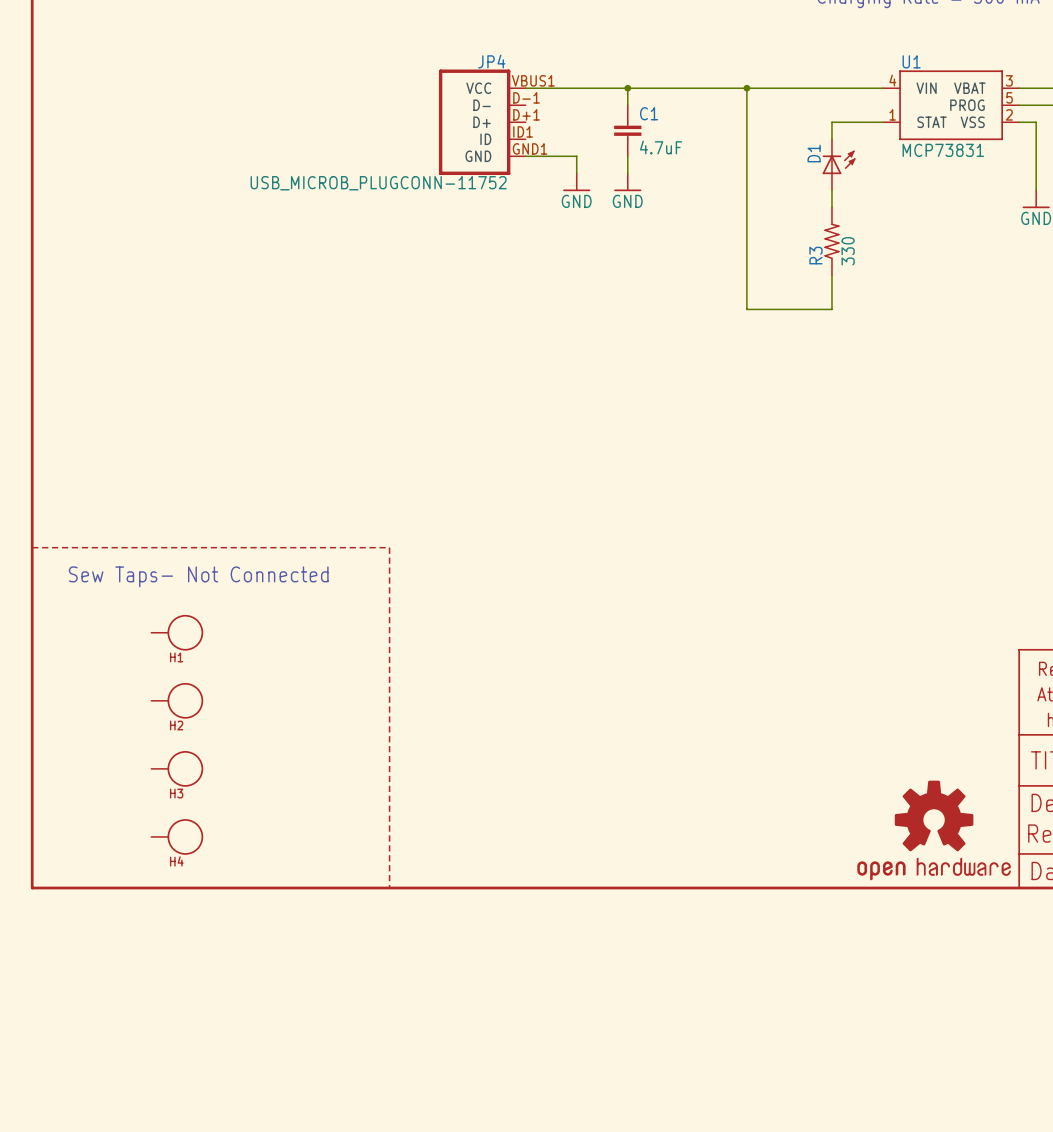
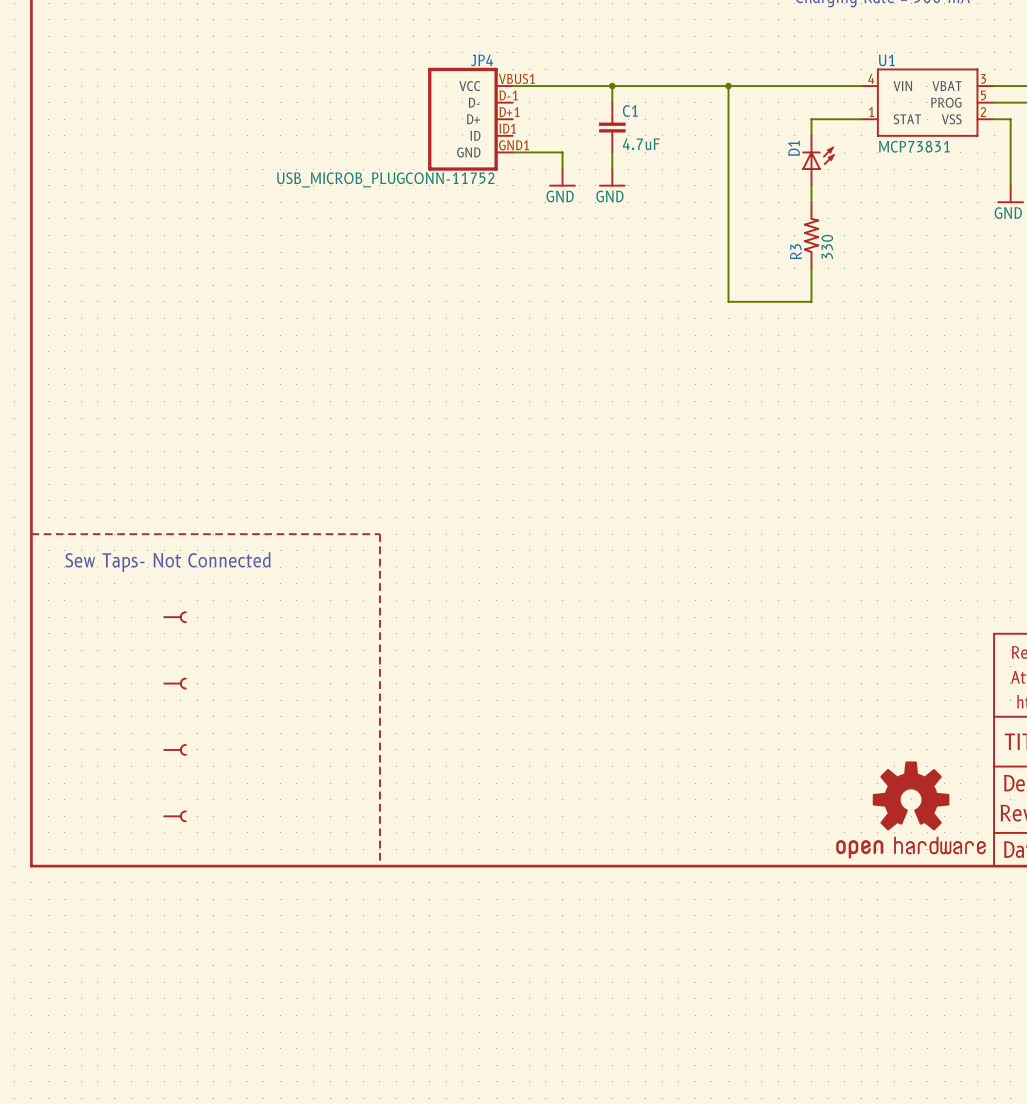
H1: (177, 632) -> none
part: none -> (174, 617)
H2: (177, 700) -> none
part: none -> (174, 683)
H3: (177, 768) -> none
part: none -> (174, 749)
H4: (177, 836) -> none
part: none -> (174, 816)

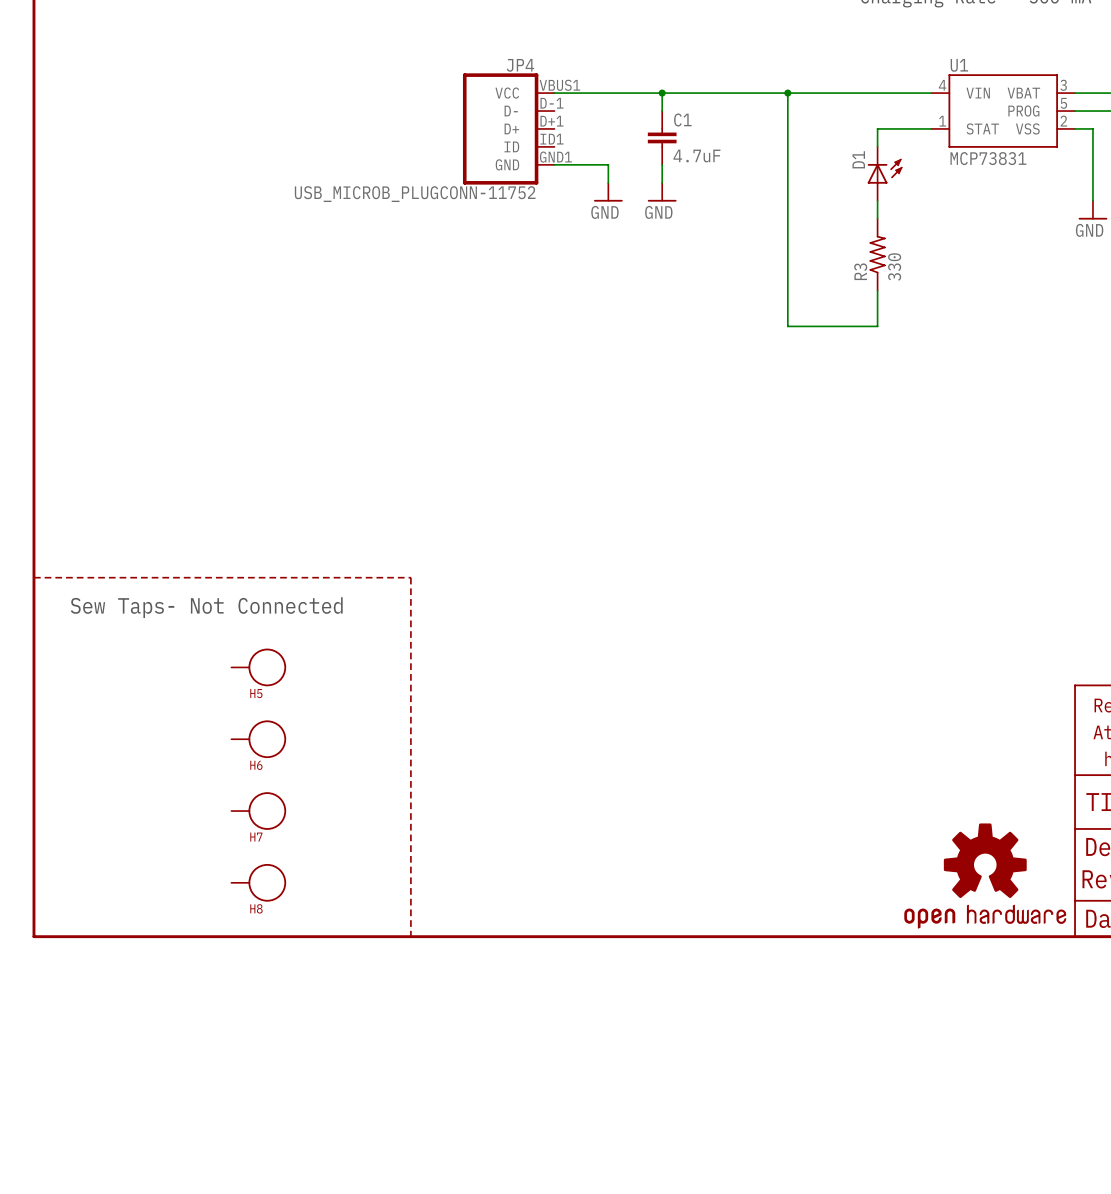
part: (174, 617) -> none
H5: none -> (258, 667)
part: (174, 683) -> none
H6: none -> (258, 739)
part: (174, 749) -> none
H7: none -> (258, 811)
part: (174, 816) -> none
H8: none -> (258, 882)

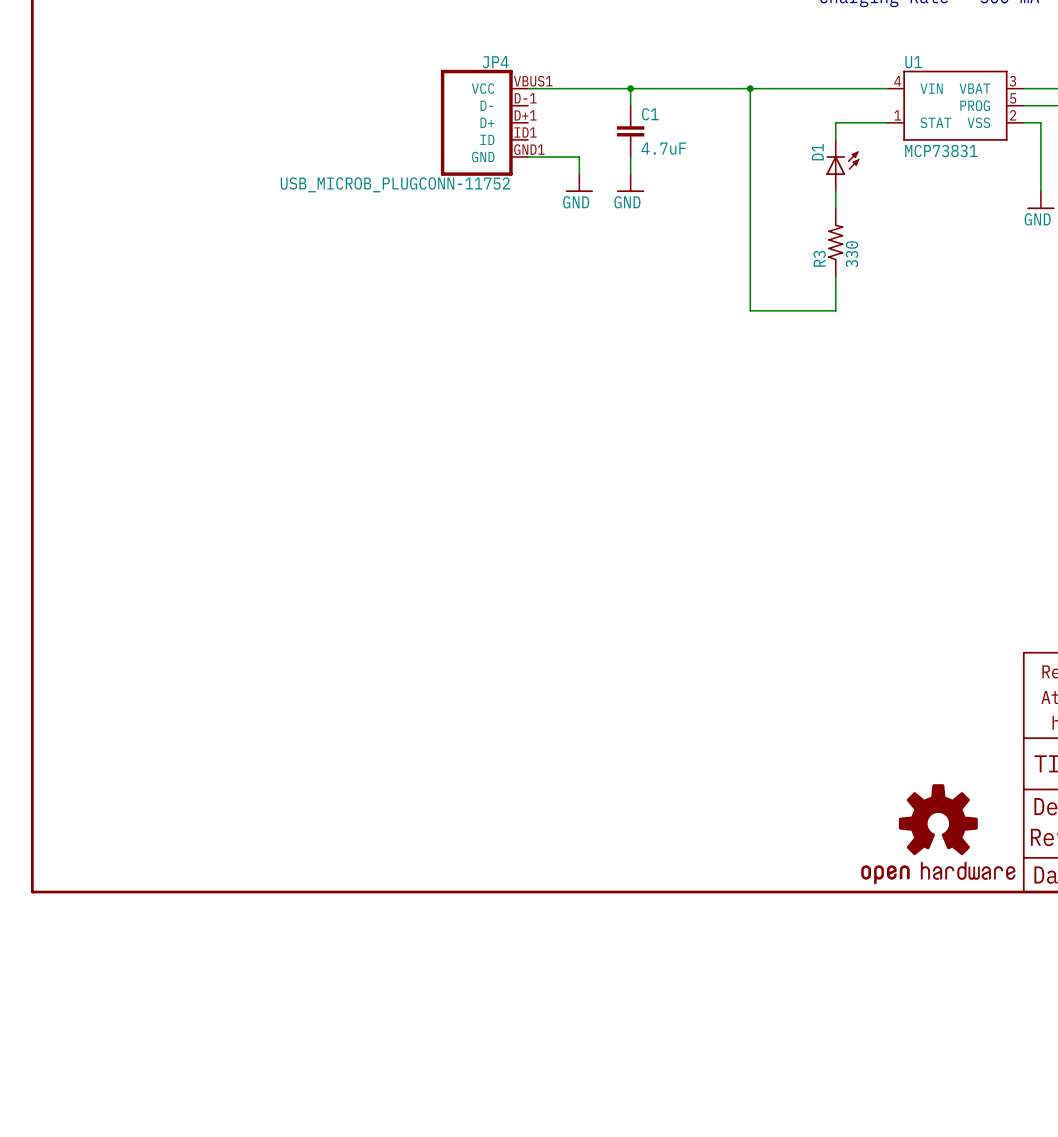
line: (33, 577) (410, 577) (410, 936) -> none
text: Sew Taps- Not Connected (206, 607) -> none
H5: (258, 667) -> none
H6: (258, 739) -> none
H7: (258, 811) -> none
H8: (258, 882) -> none

